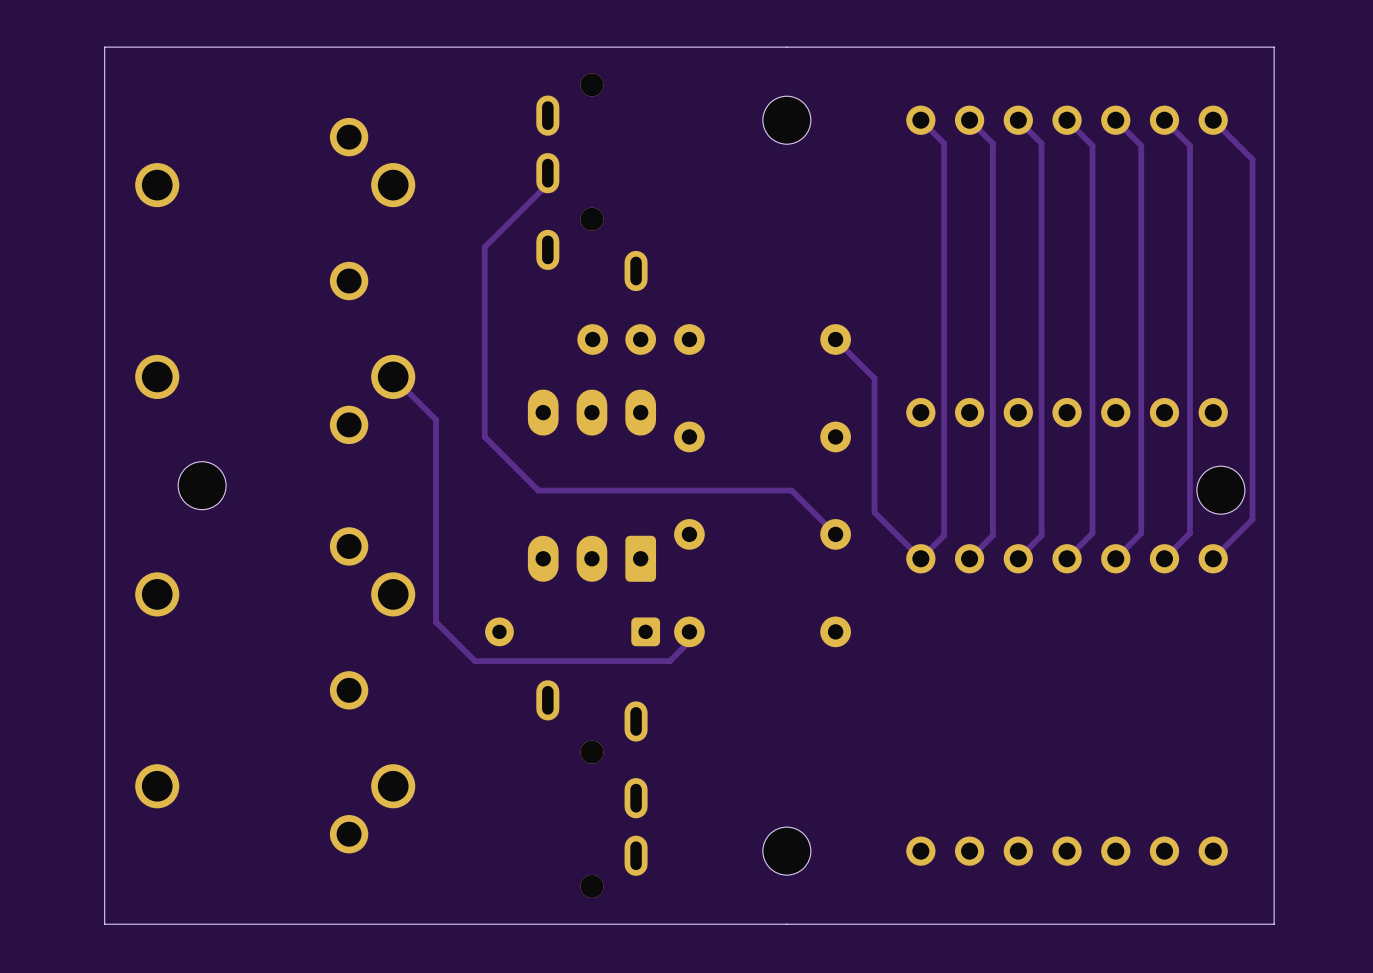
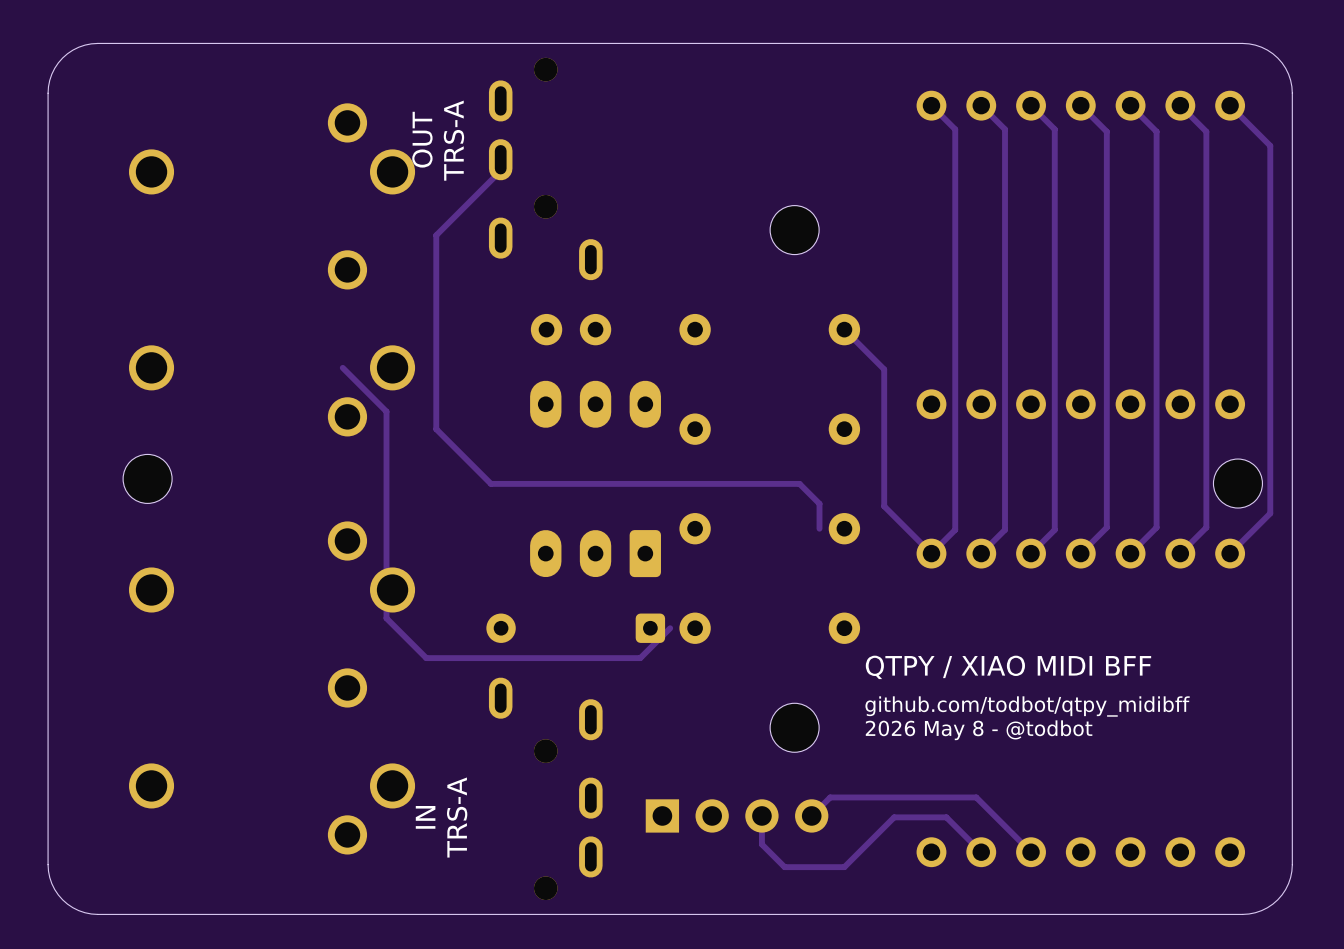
board edge: (1274, 108) (1274, 47) (104, 47) (104, 924) (1274, 924) (1274, 863) -> (1292, 93) (1288, 74) (1277, 58) (1261, 47) (1242, 43) (97, 43) (78, 47) (62, 58) (51, 74) (48, 93) (48, 864) (49, 877) (54, 889) (62, 899) (72, 907) (84, 912) (97, 914) (1242, 914) (1261, 910) (1277, 899) (1288, 883) (1292, 864)
part position: (786, 120) -> (794, 230)
text: none -> OUT (422, 139)
text: none -> TRS-A (453, 140)
part position: (591, 182) -> (545, 169)
track: (547, 184) (484, 247) (484, 436) (538, 490) -> (436, 429) (491, 483) (540, 483)
part position: (616, 339) -> (571, 329)
track: (393, 376) (436, 419) -> (500, 170) (436, 235) (436, 411)
track: (436, 436) (436, 622) (475, 661) -> (342, 367) (386, 411) (386, 618) (426, 658) (476, 658)
part position: (202, 485) -> (147, 478)
track: (811, 510) (835, 534) -> (819, 503) (819, 528)
track: (689, 622) (689, 641) (669, 661) (635, 661) -> (670, 628) (640, 658)
text: none -> QTPY / XIAO MIDI BFF (1008, 667)
text: none -> github.com/todbot/qtpy_midibff (1027, 706)
text: none -> 2026 May 8 - @todbot (979, 730)
part position: (591, 789) -> (545, 788)
part: none -> (737, 815)
track: none -> (761, 815) (761, 844) (784, 867) (844, 867) (894, 817) (946, 817) (981, 852)
track: none -> (811, 815) (830, 797) (976, 797) (1031, 852)
text: none -> IN (425, 817)
text: none -> TRS-A (457, 817)
part position: (786, 851) -> (794, 727)

